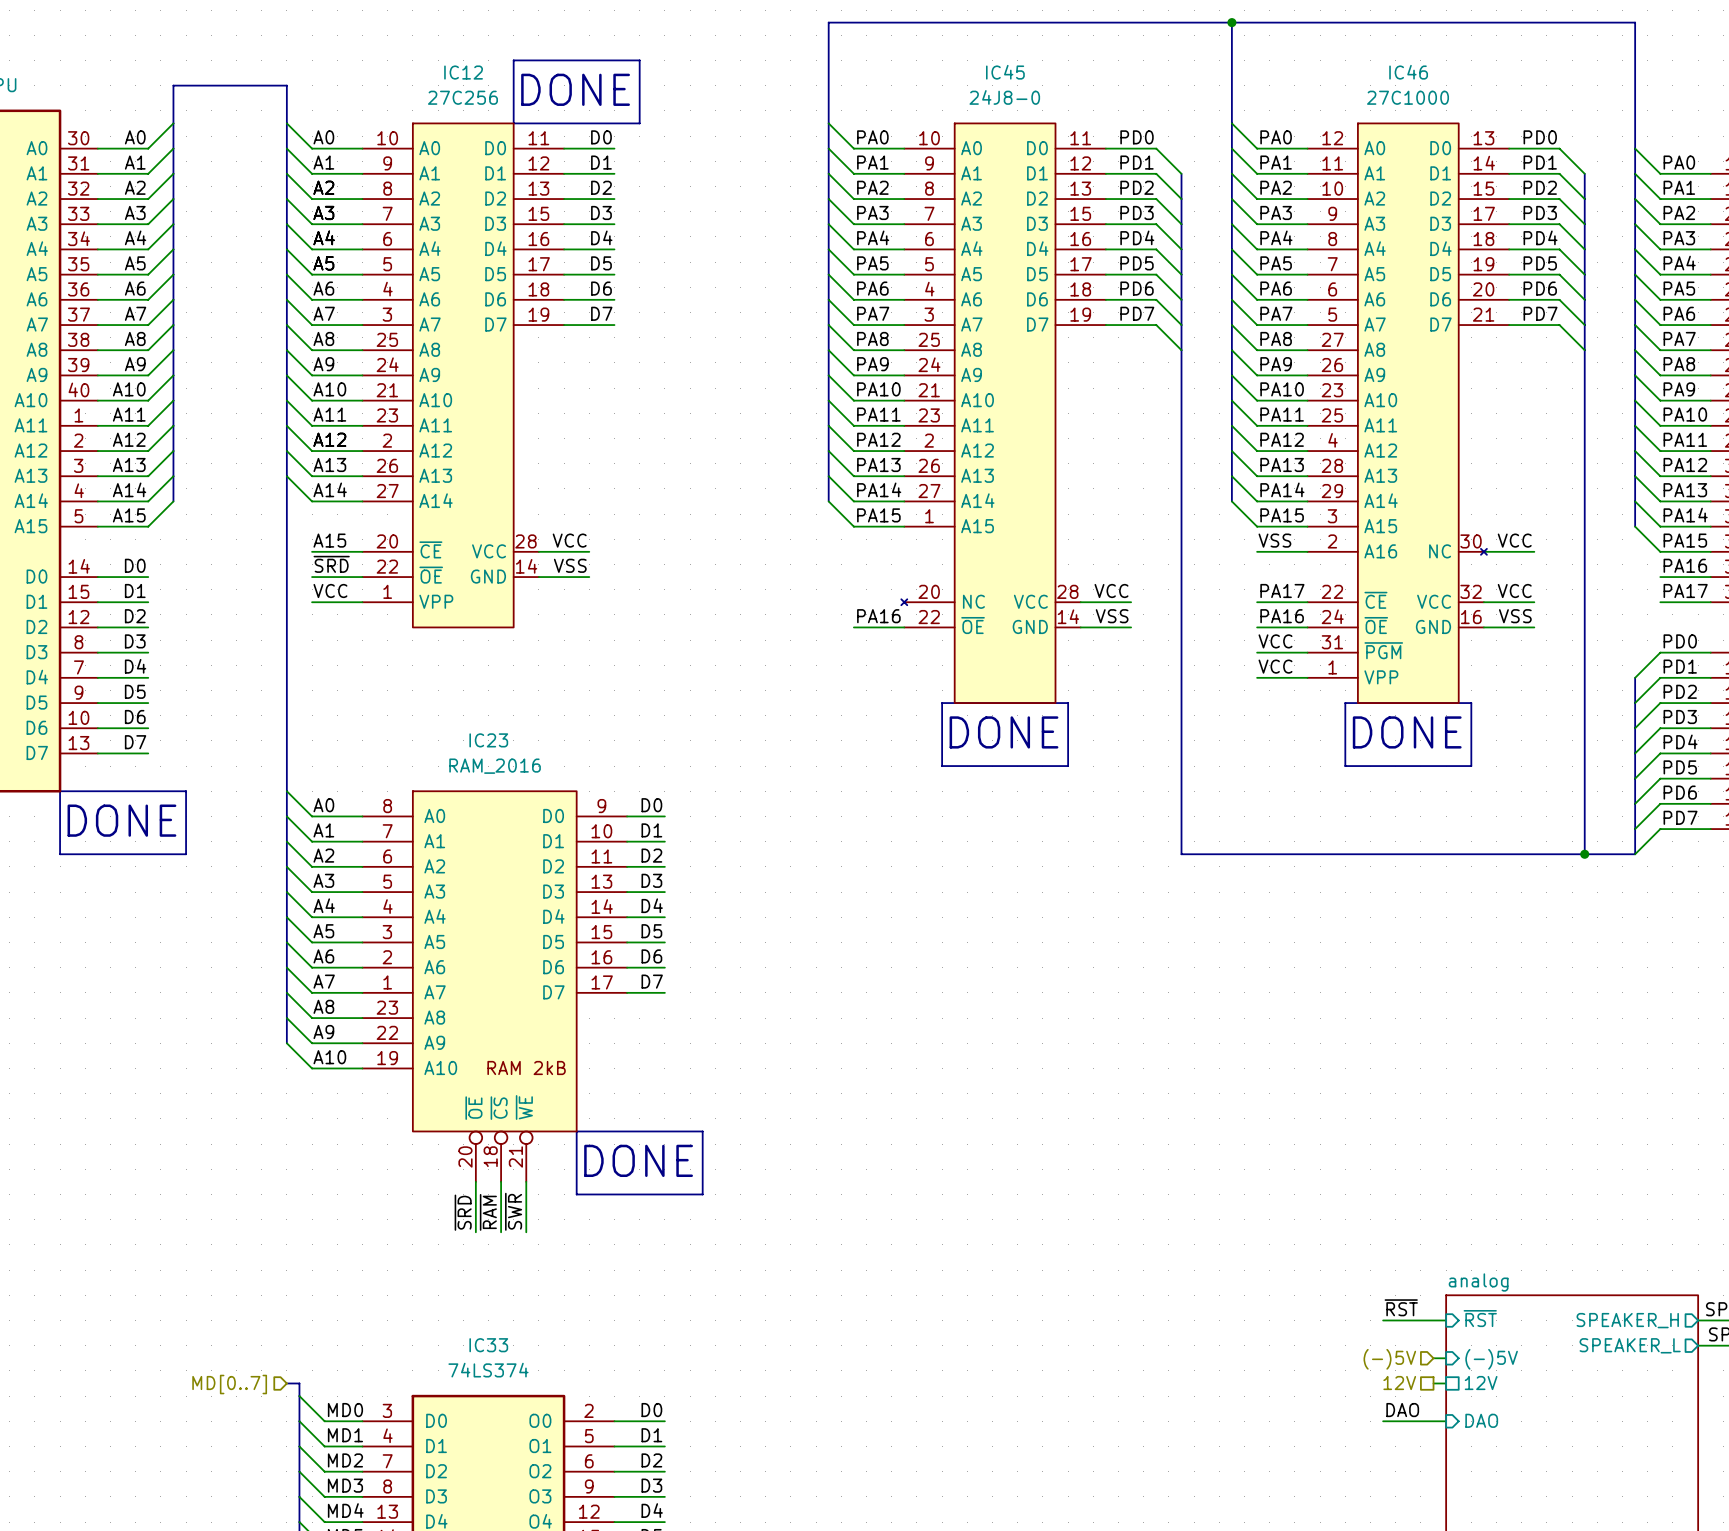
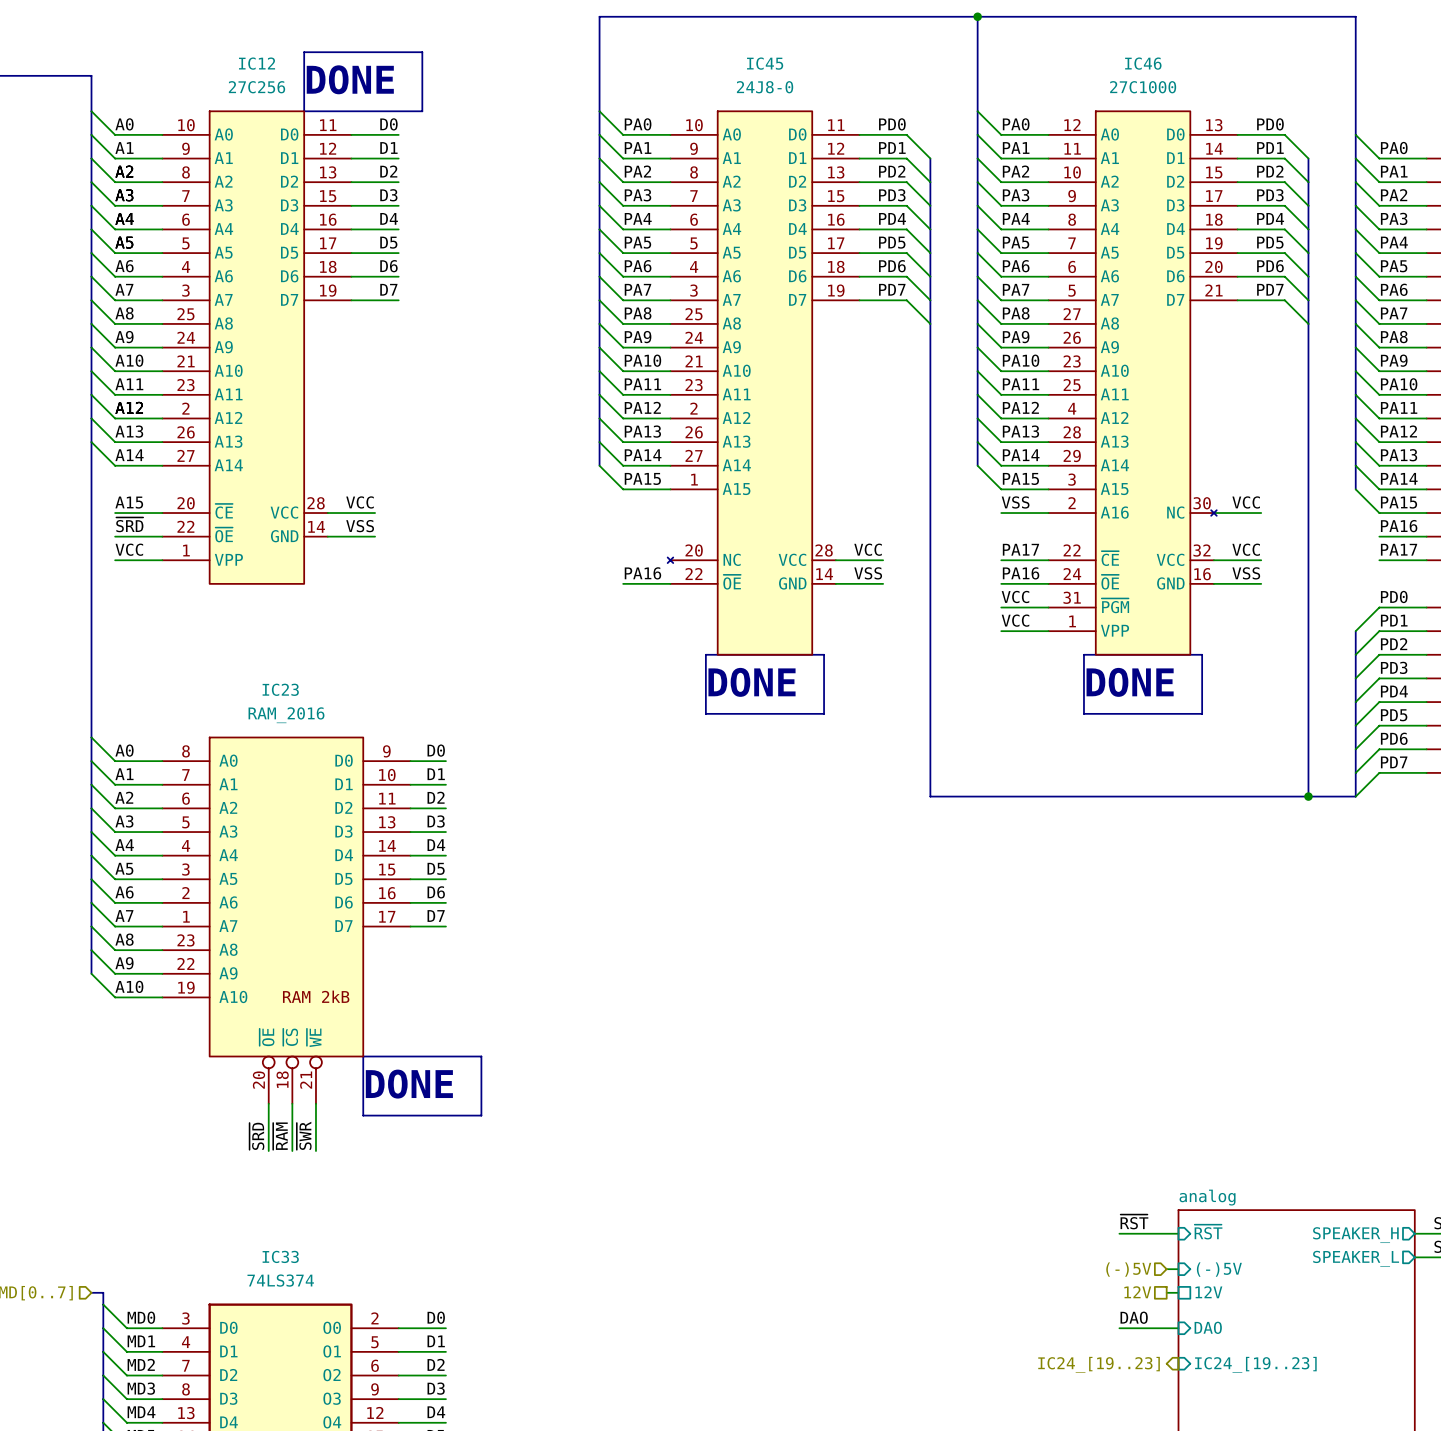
hierarchical label: none -> IC24_[19..23] (1099, 1364)
sheet pin: none -> IC24_[19..23] (1255, 1364)

